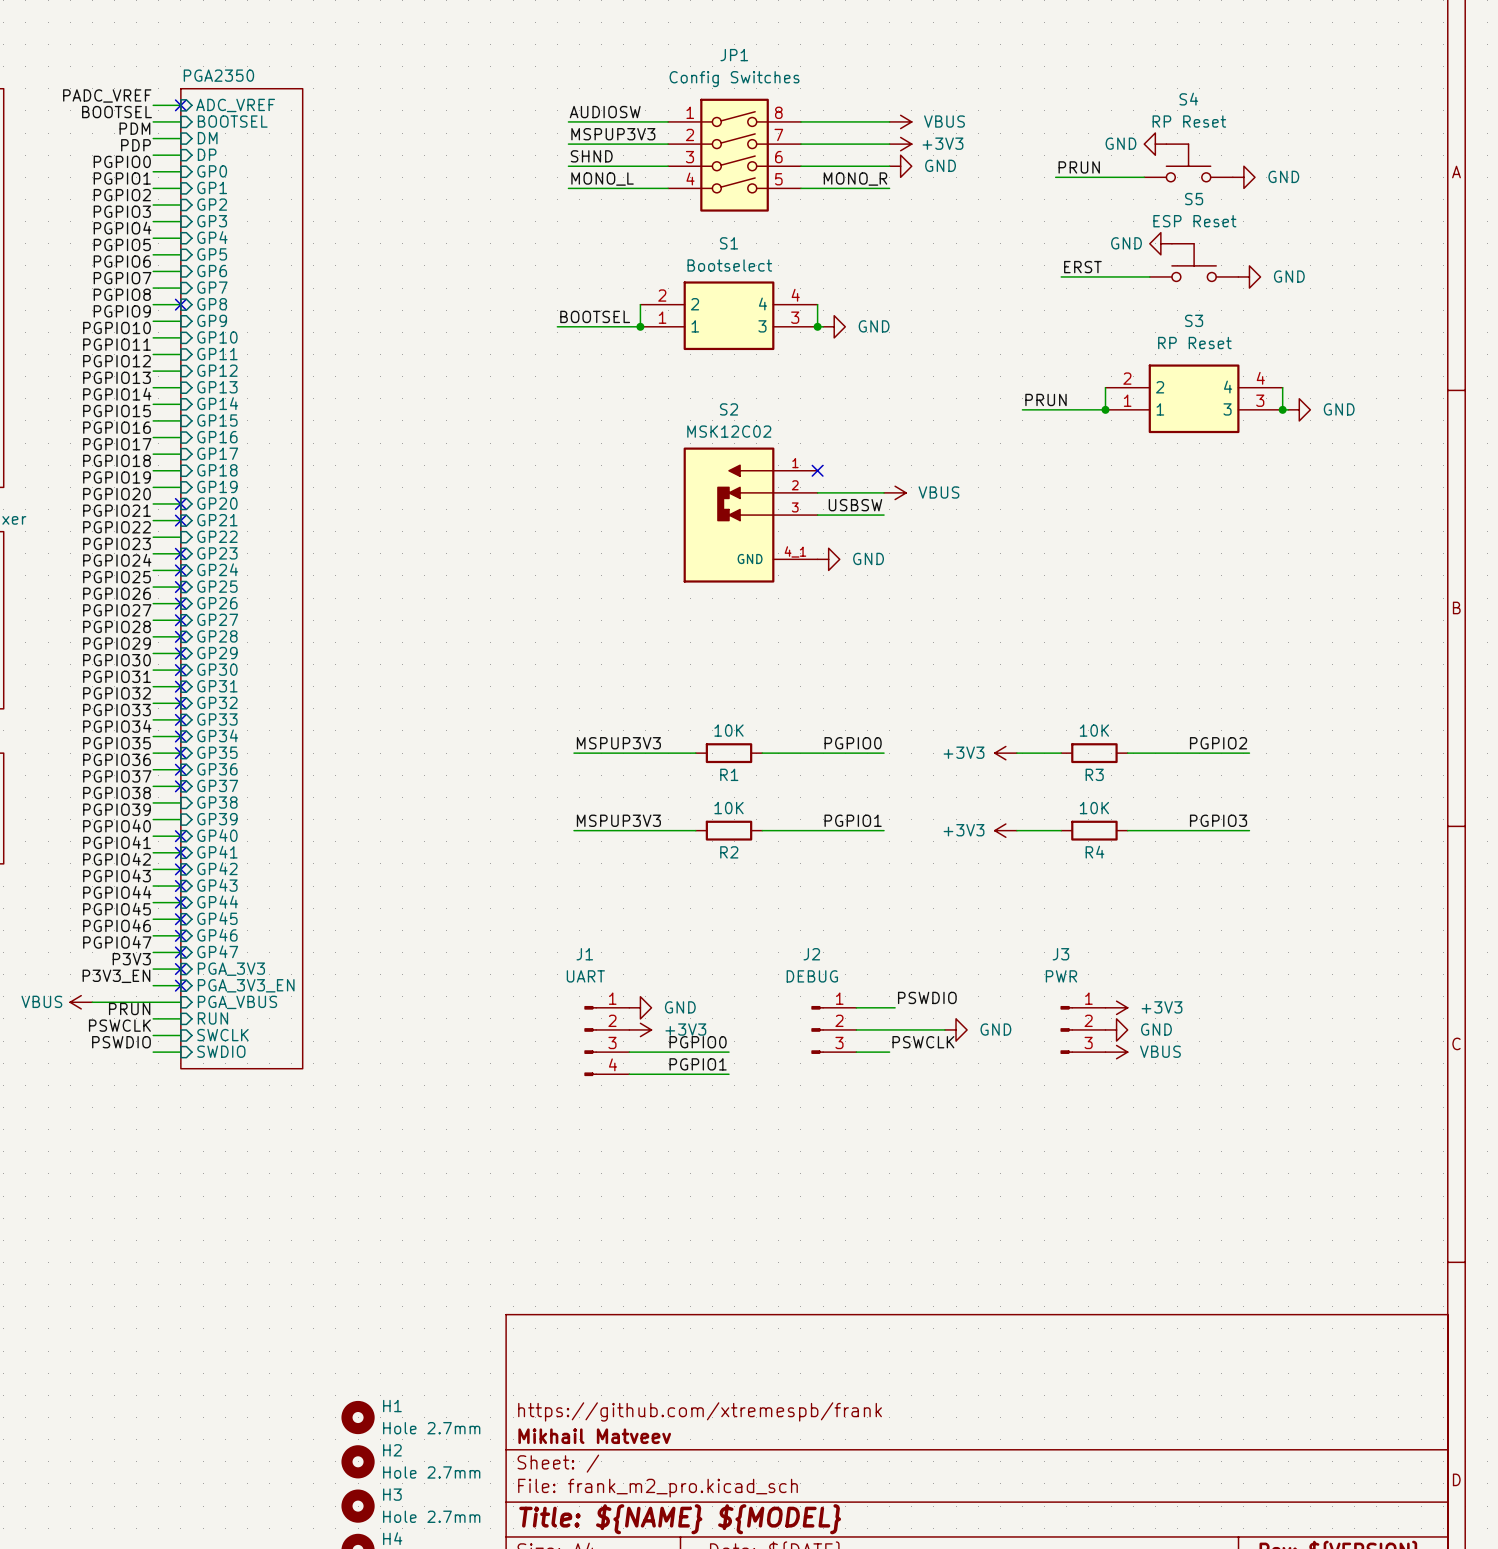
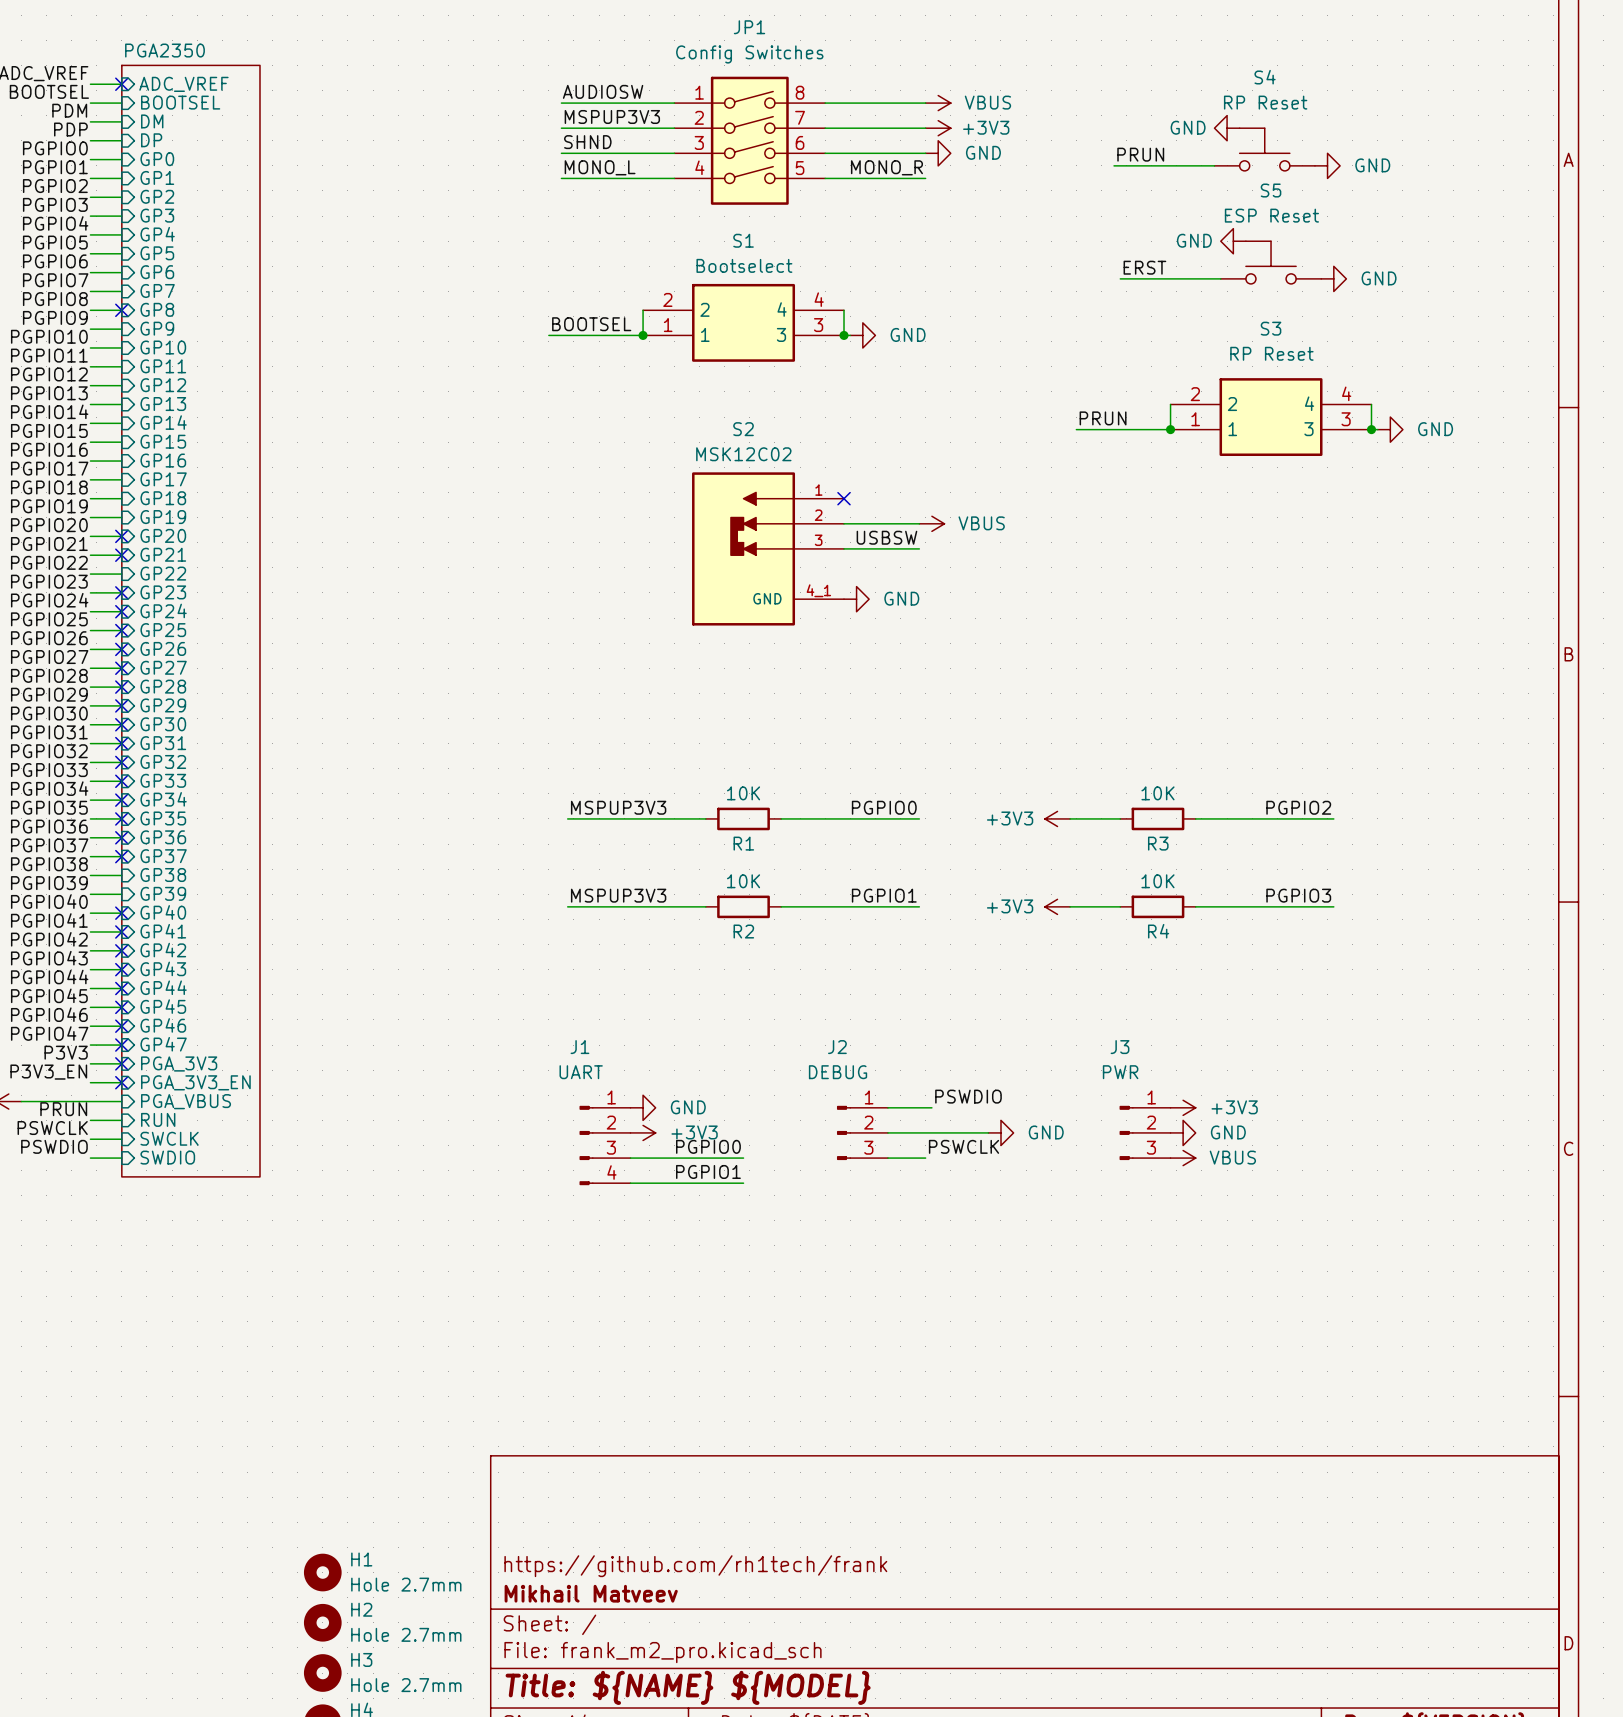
title block: https://github.com/xtremespb/frank (700, 1411) -> https://github.com/rh1tech/frank (695, 1566)

